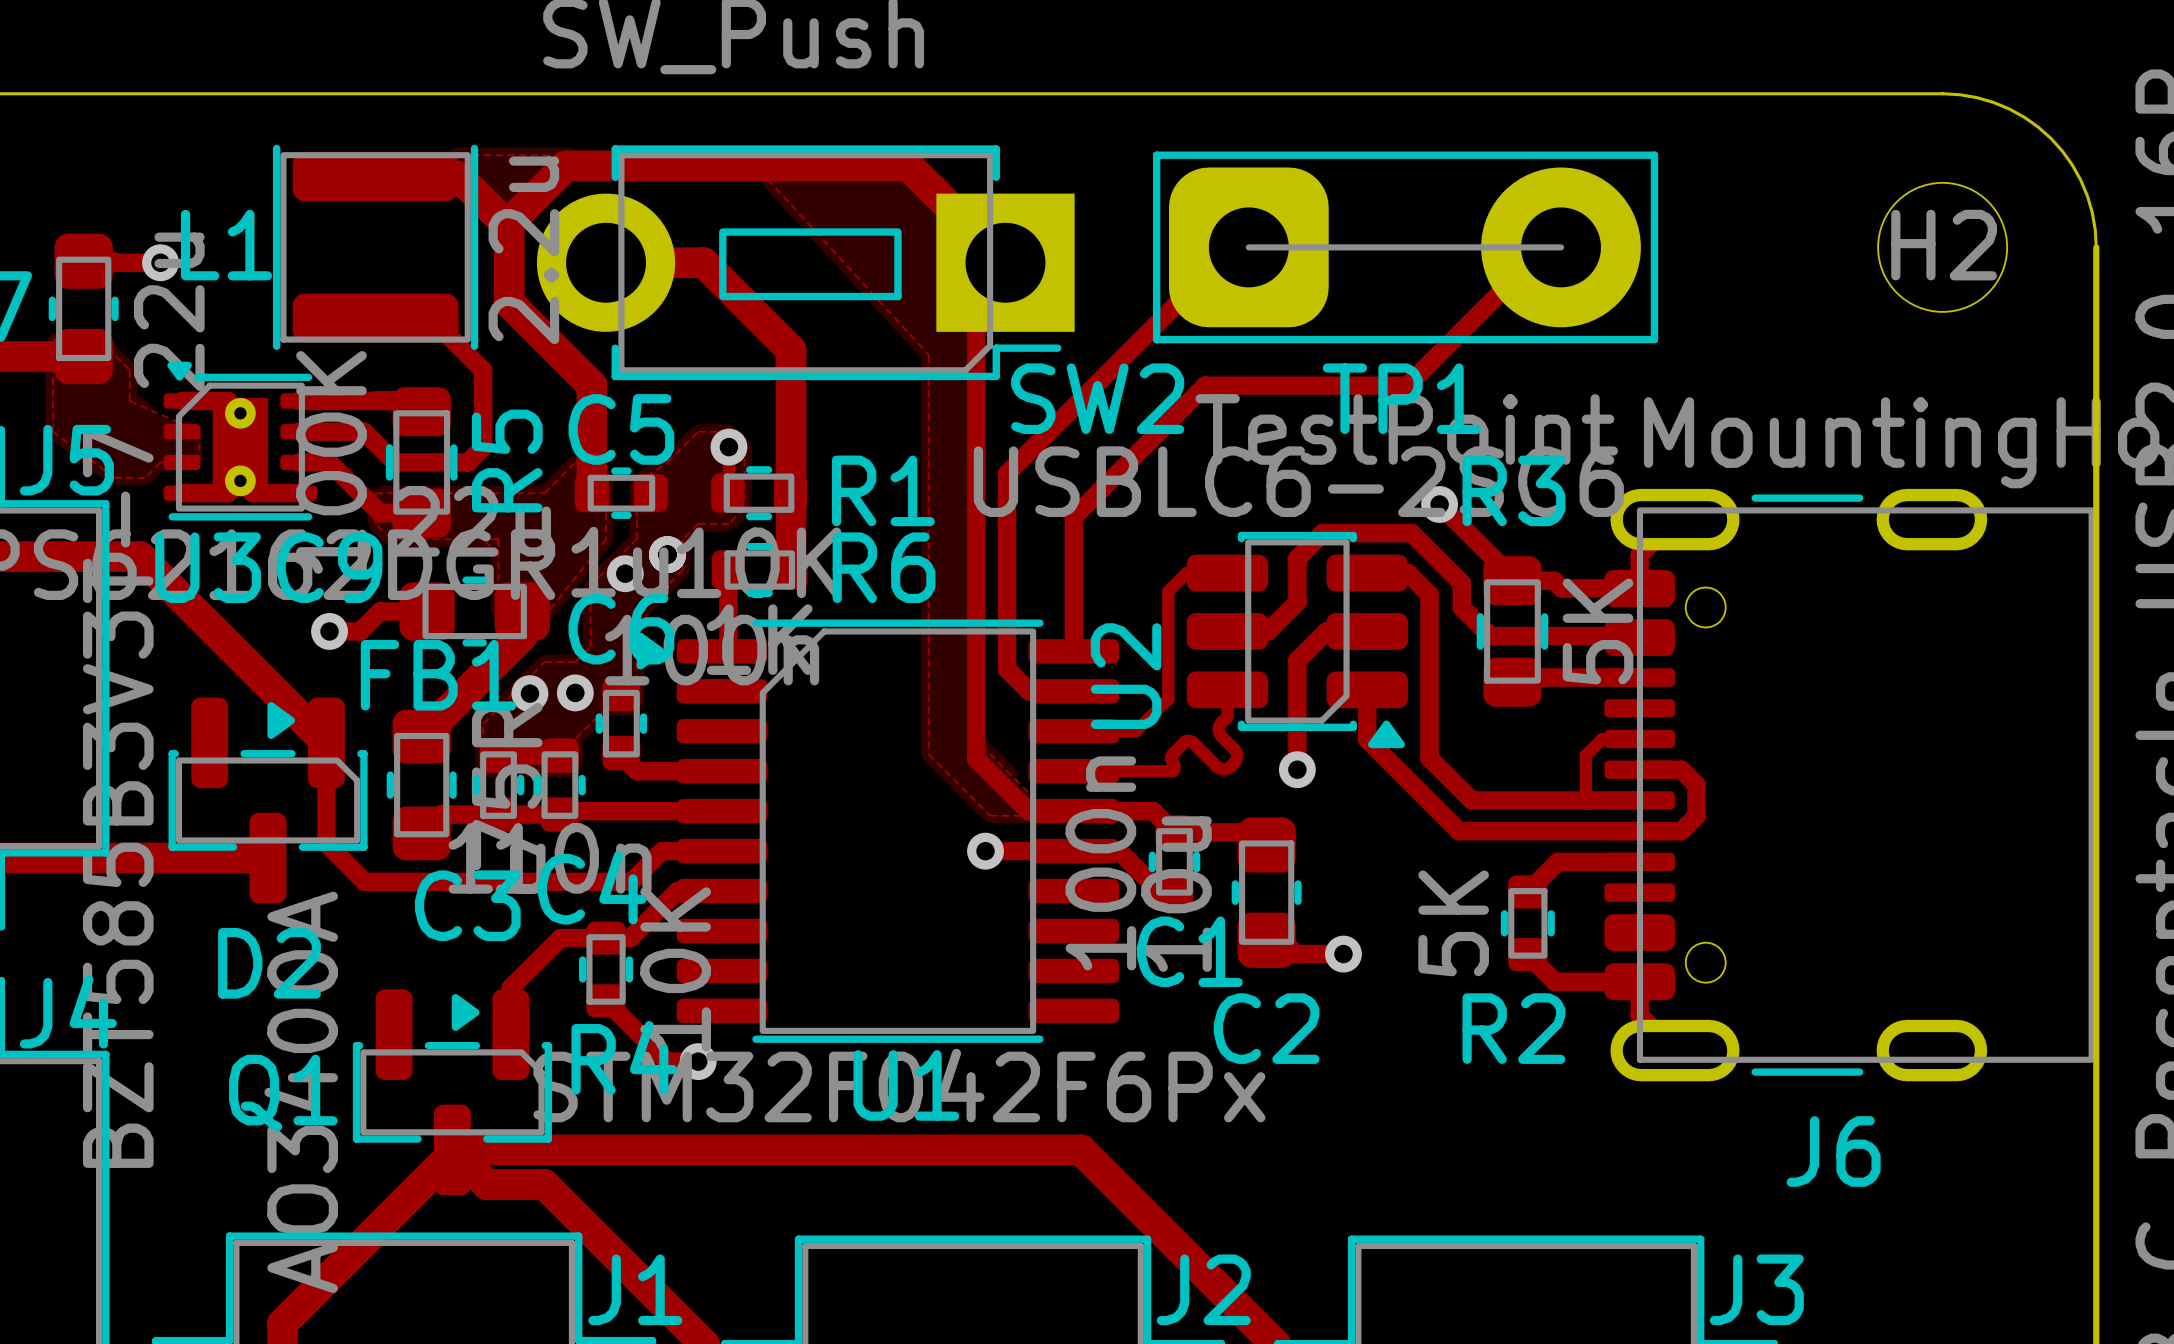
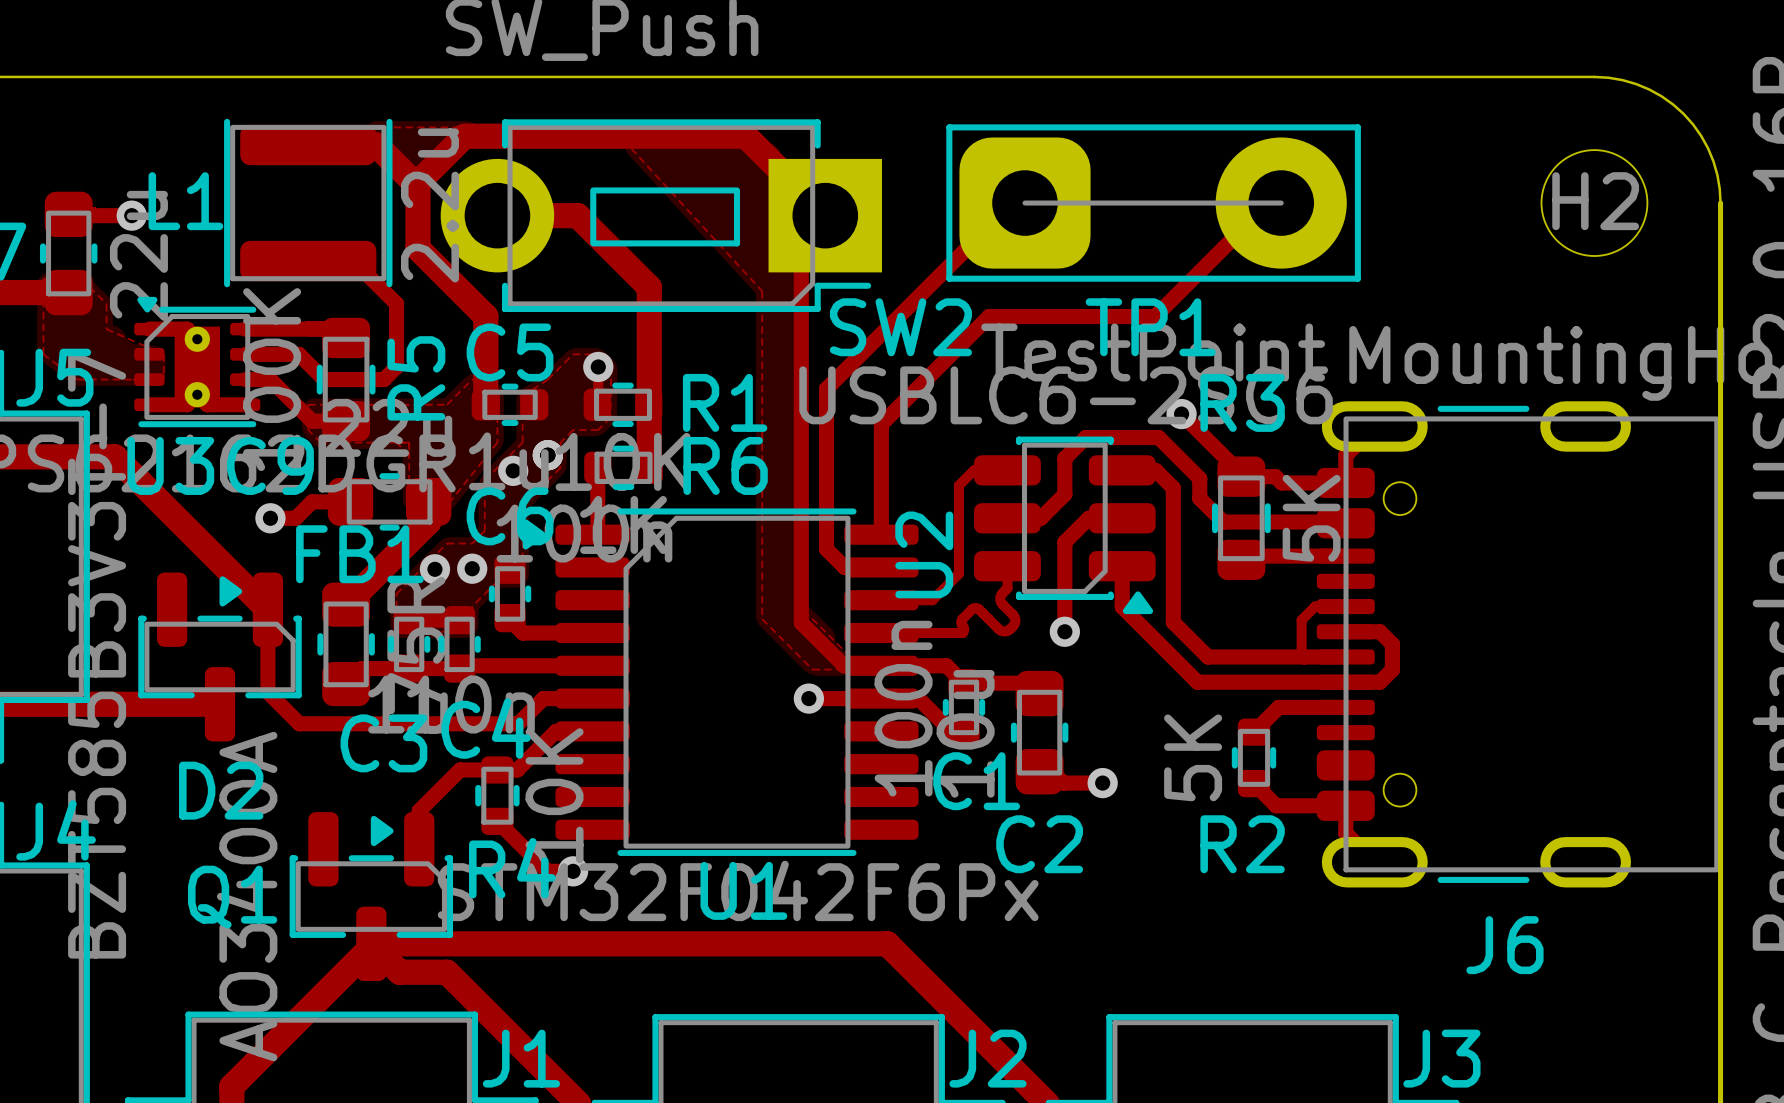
zone outline: (93, 462) (114, 477) (145, 477) (160, 462) -> (77, 379) (131, 379)

